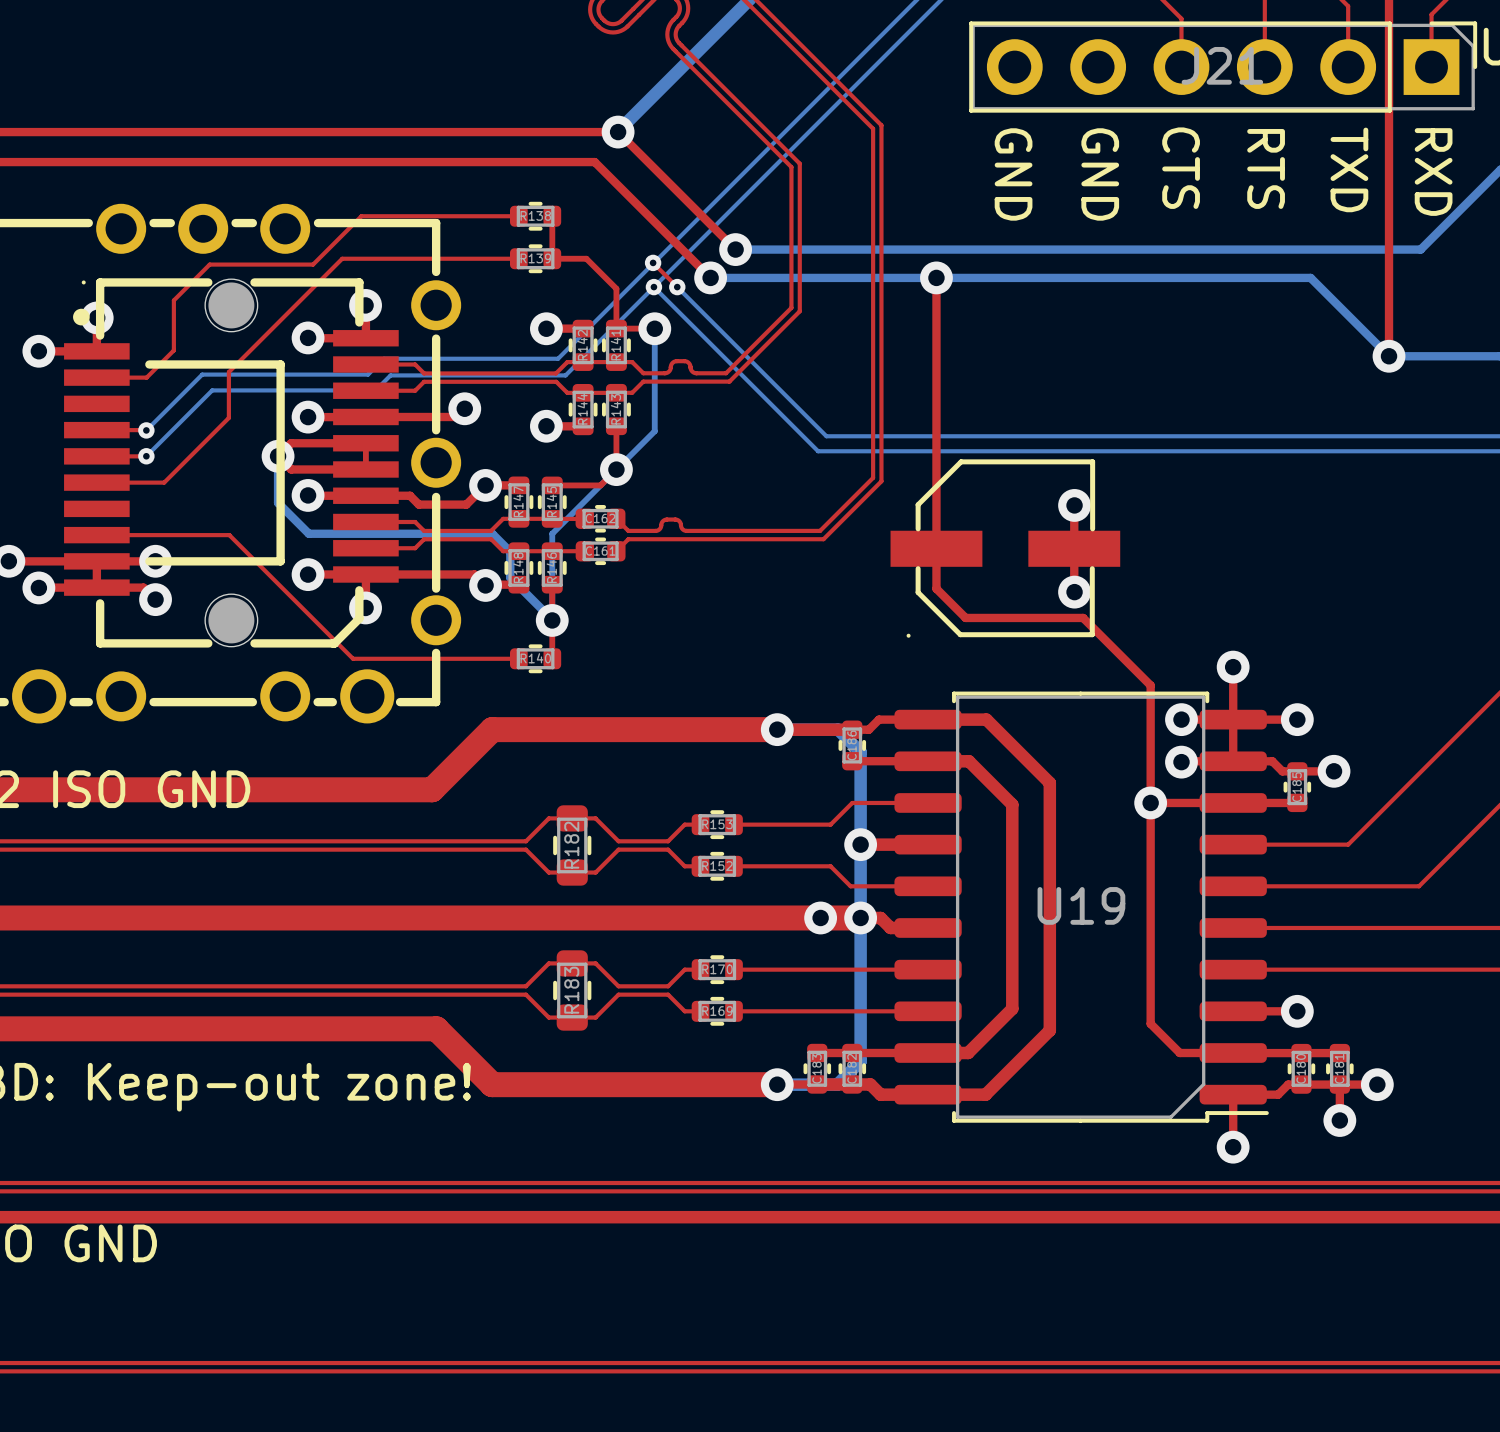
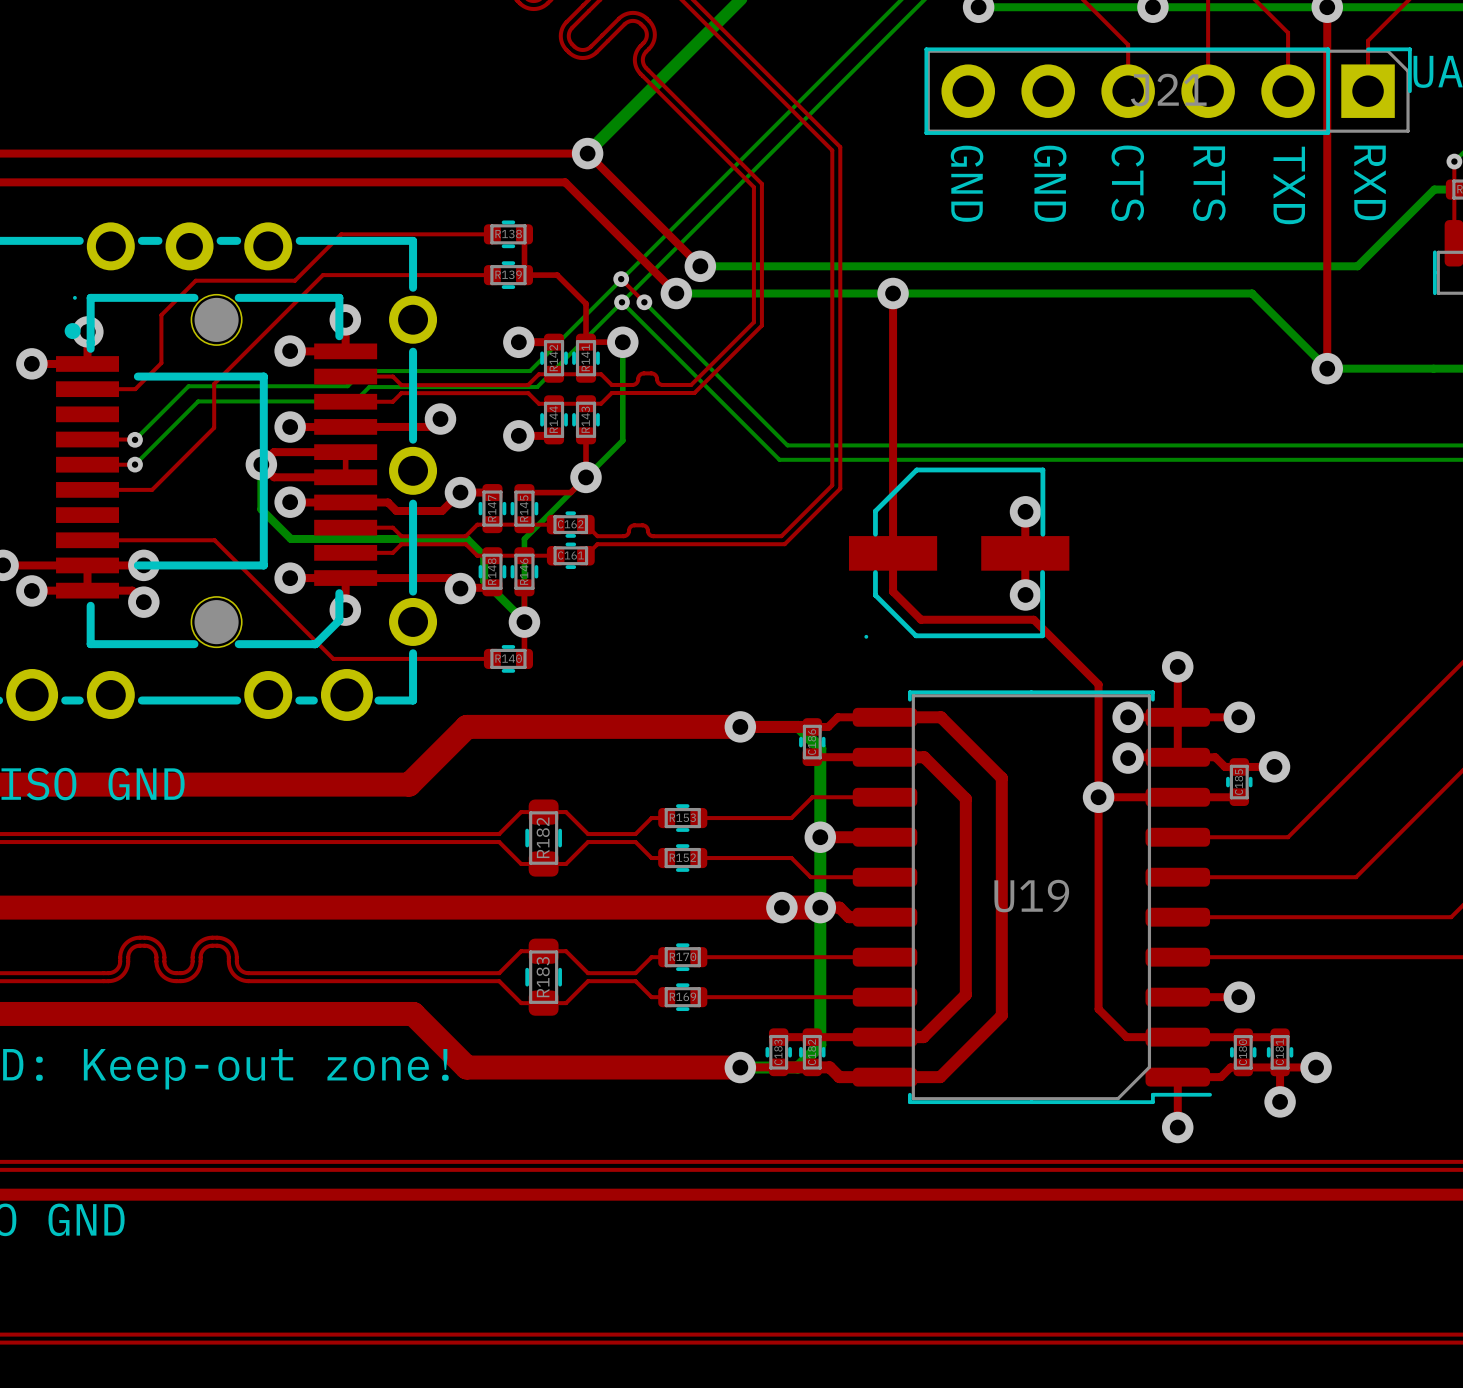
top track: (118, 986) (189, 986) -> (108, 973) (118, 967) (120, 953) (124, 945) (131, 939) (139, 937) (151, 938) (158, 943) (163, 950) (166, 967) (176, 973)
top track: (194, 986) (264, 986) -> (180, 973) (190, 967) (193, 953) (196, 945) (203, 939) (212, 937) (223, 938) (231, 943) (235, 950) (238, 967) (248, 973)
top track: (118, 994) (189, 994) -> (108, 981) (117, 979) (123, 973) (127, 965) (130, 951) (139, 945) (147, 945) (152, 949) (160, 973) (167, 979) (176, 981)
top track: (194, 994) (264, 994) -> (180, 981) (189, 979) (196, 973) (200, 965) (202, 951) (212, 945) (219, 945) (225, 949) (233, 973) (240, 979) (248, 981)

